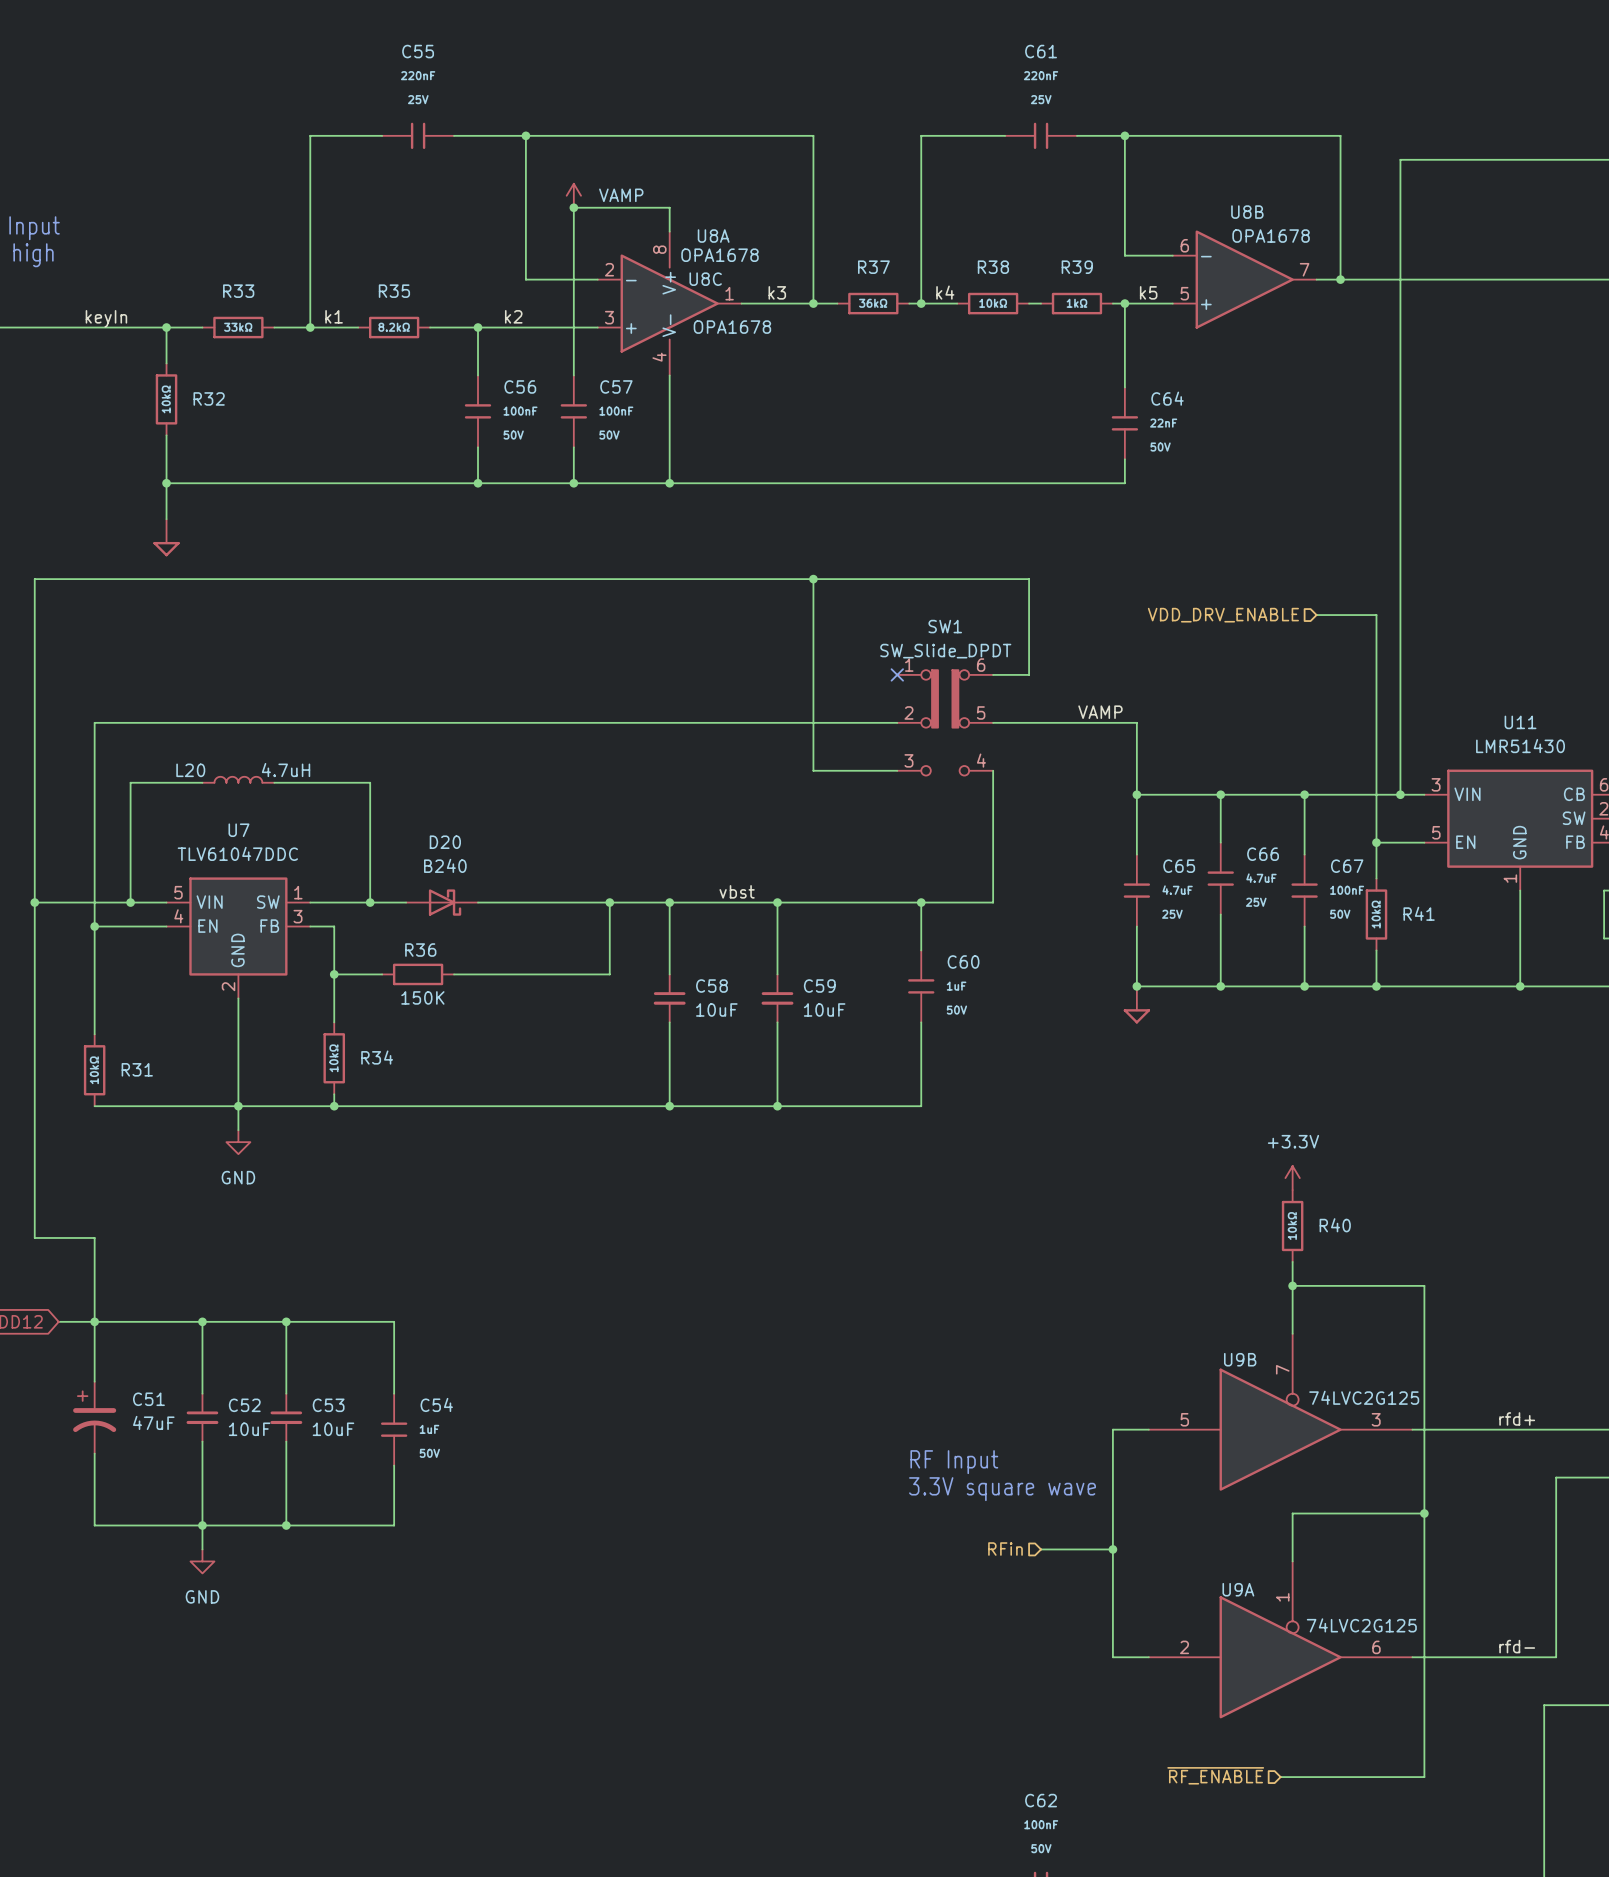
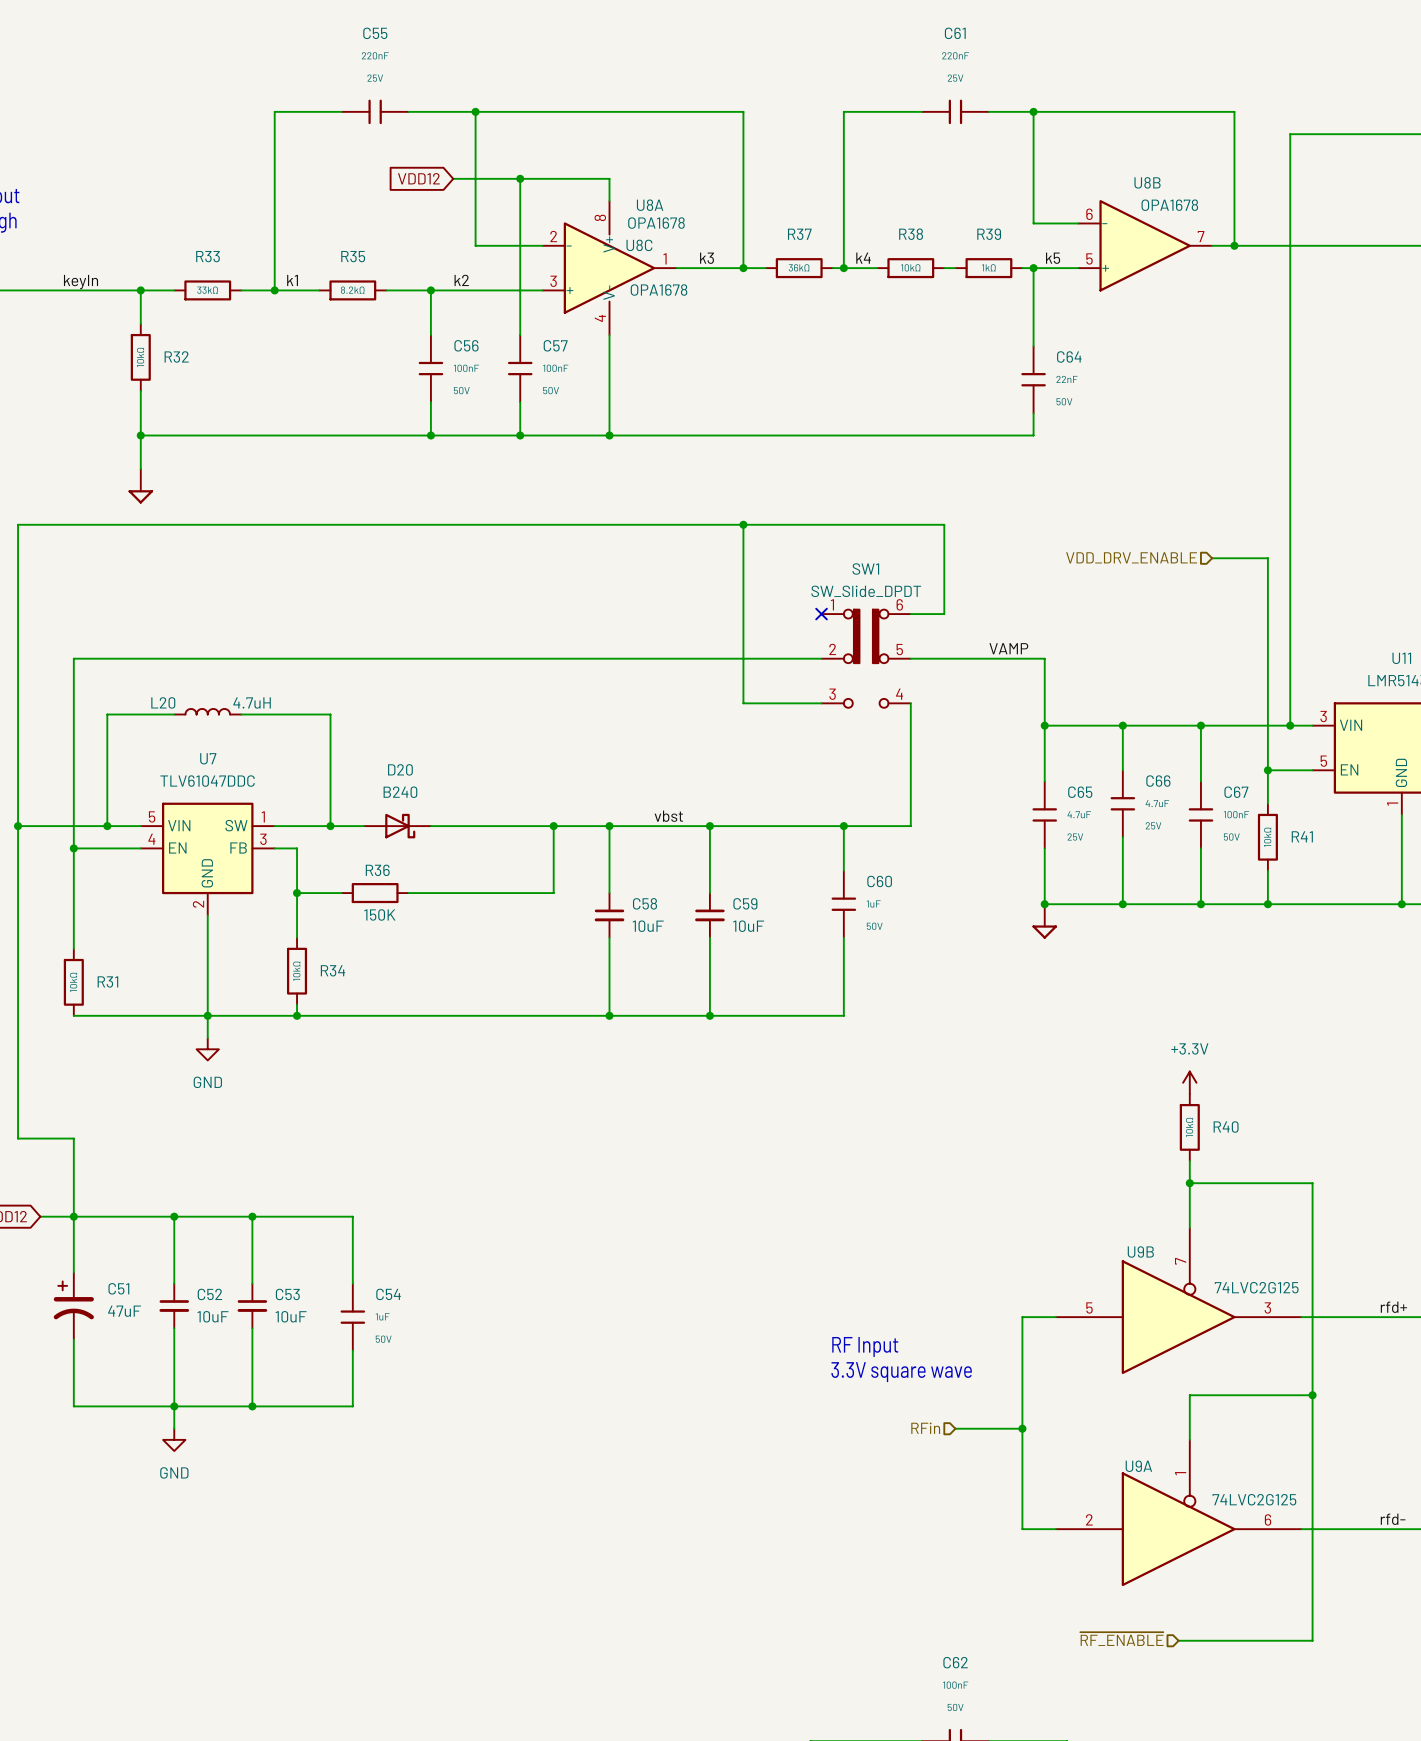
power symbol: VAMP (573, 195) -> none
global label: none -> VDD12 (418, 178)
wire: none -> (453, 178) (520, 178)

